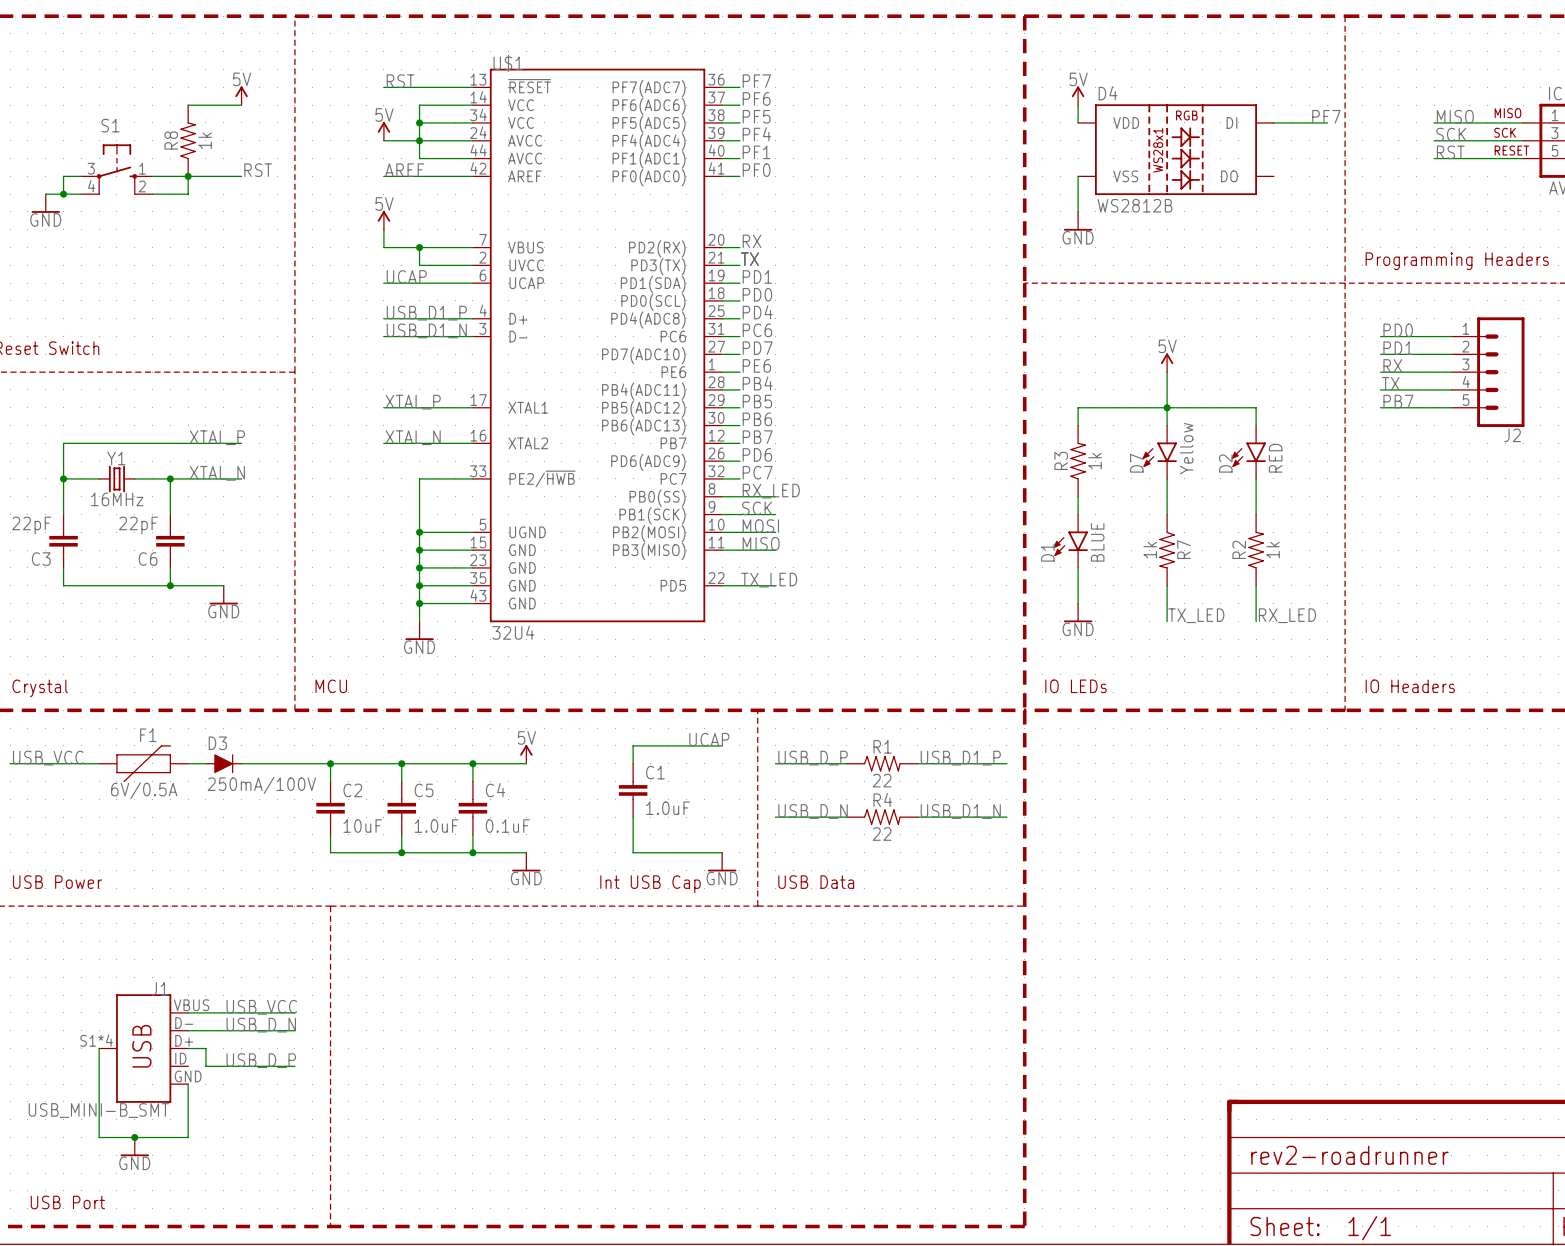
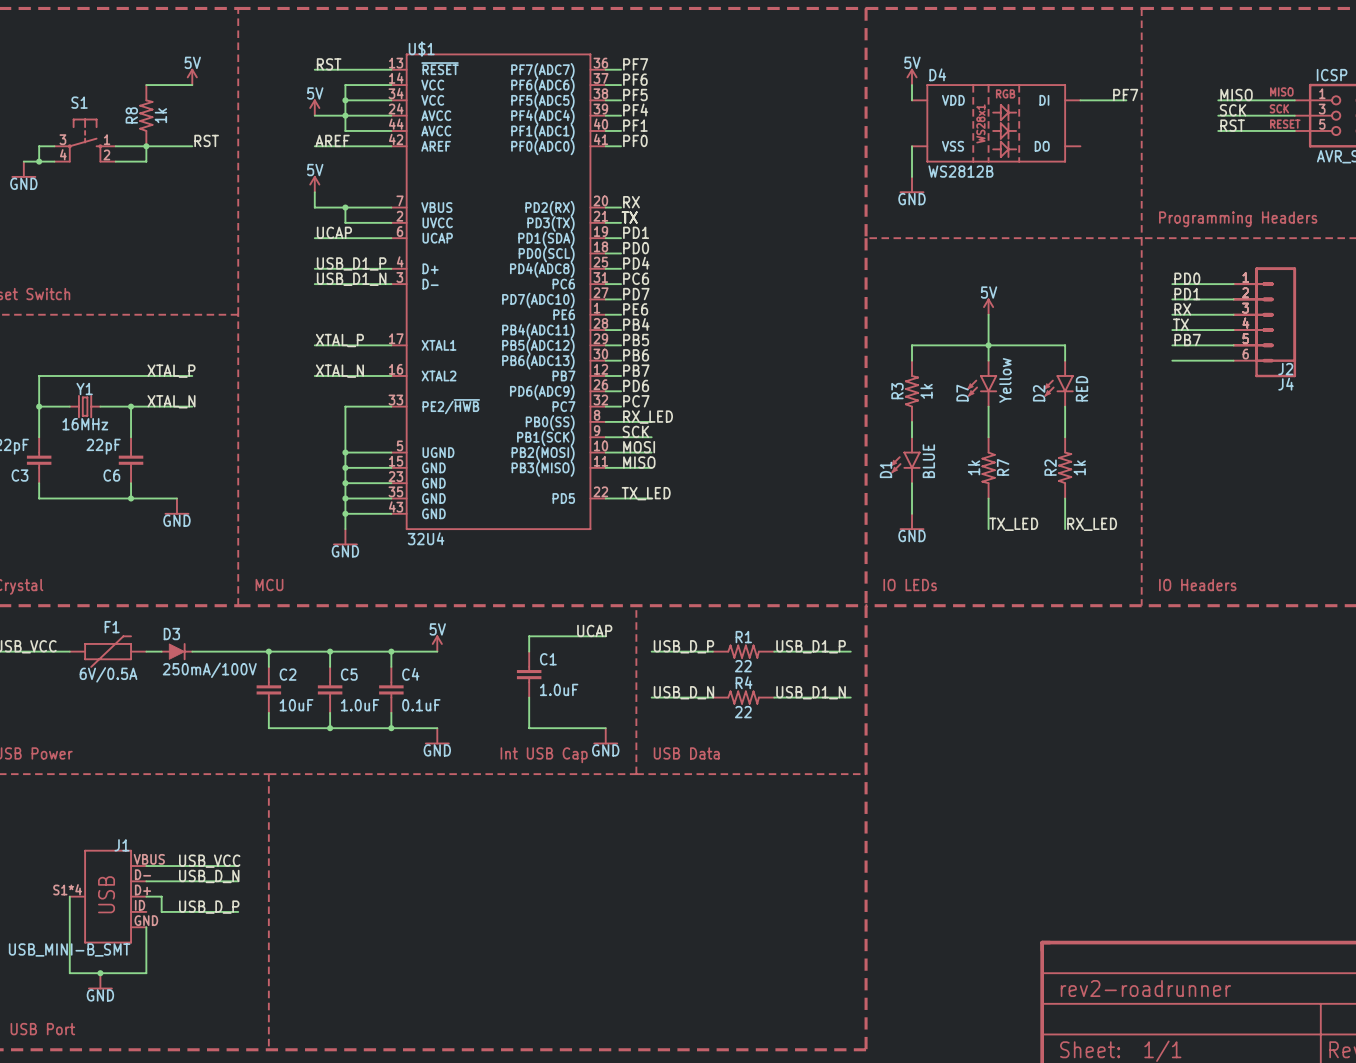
J4: none -> (1264, 322)
wire: none -> (1172, 360) (1233, 360)

